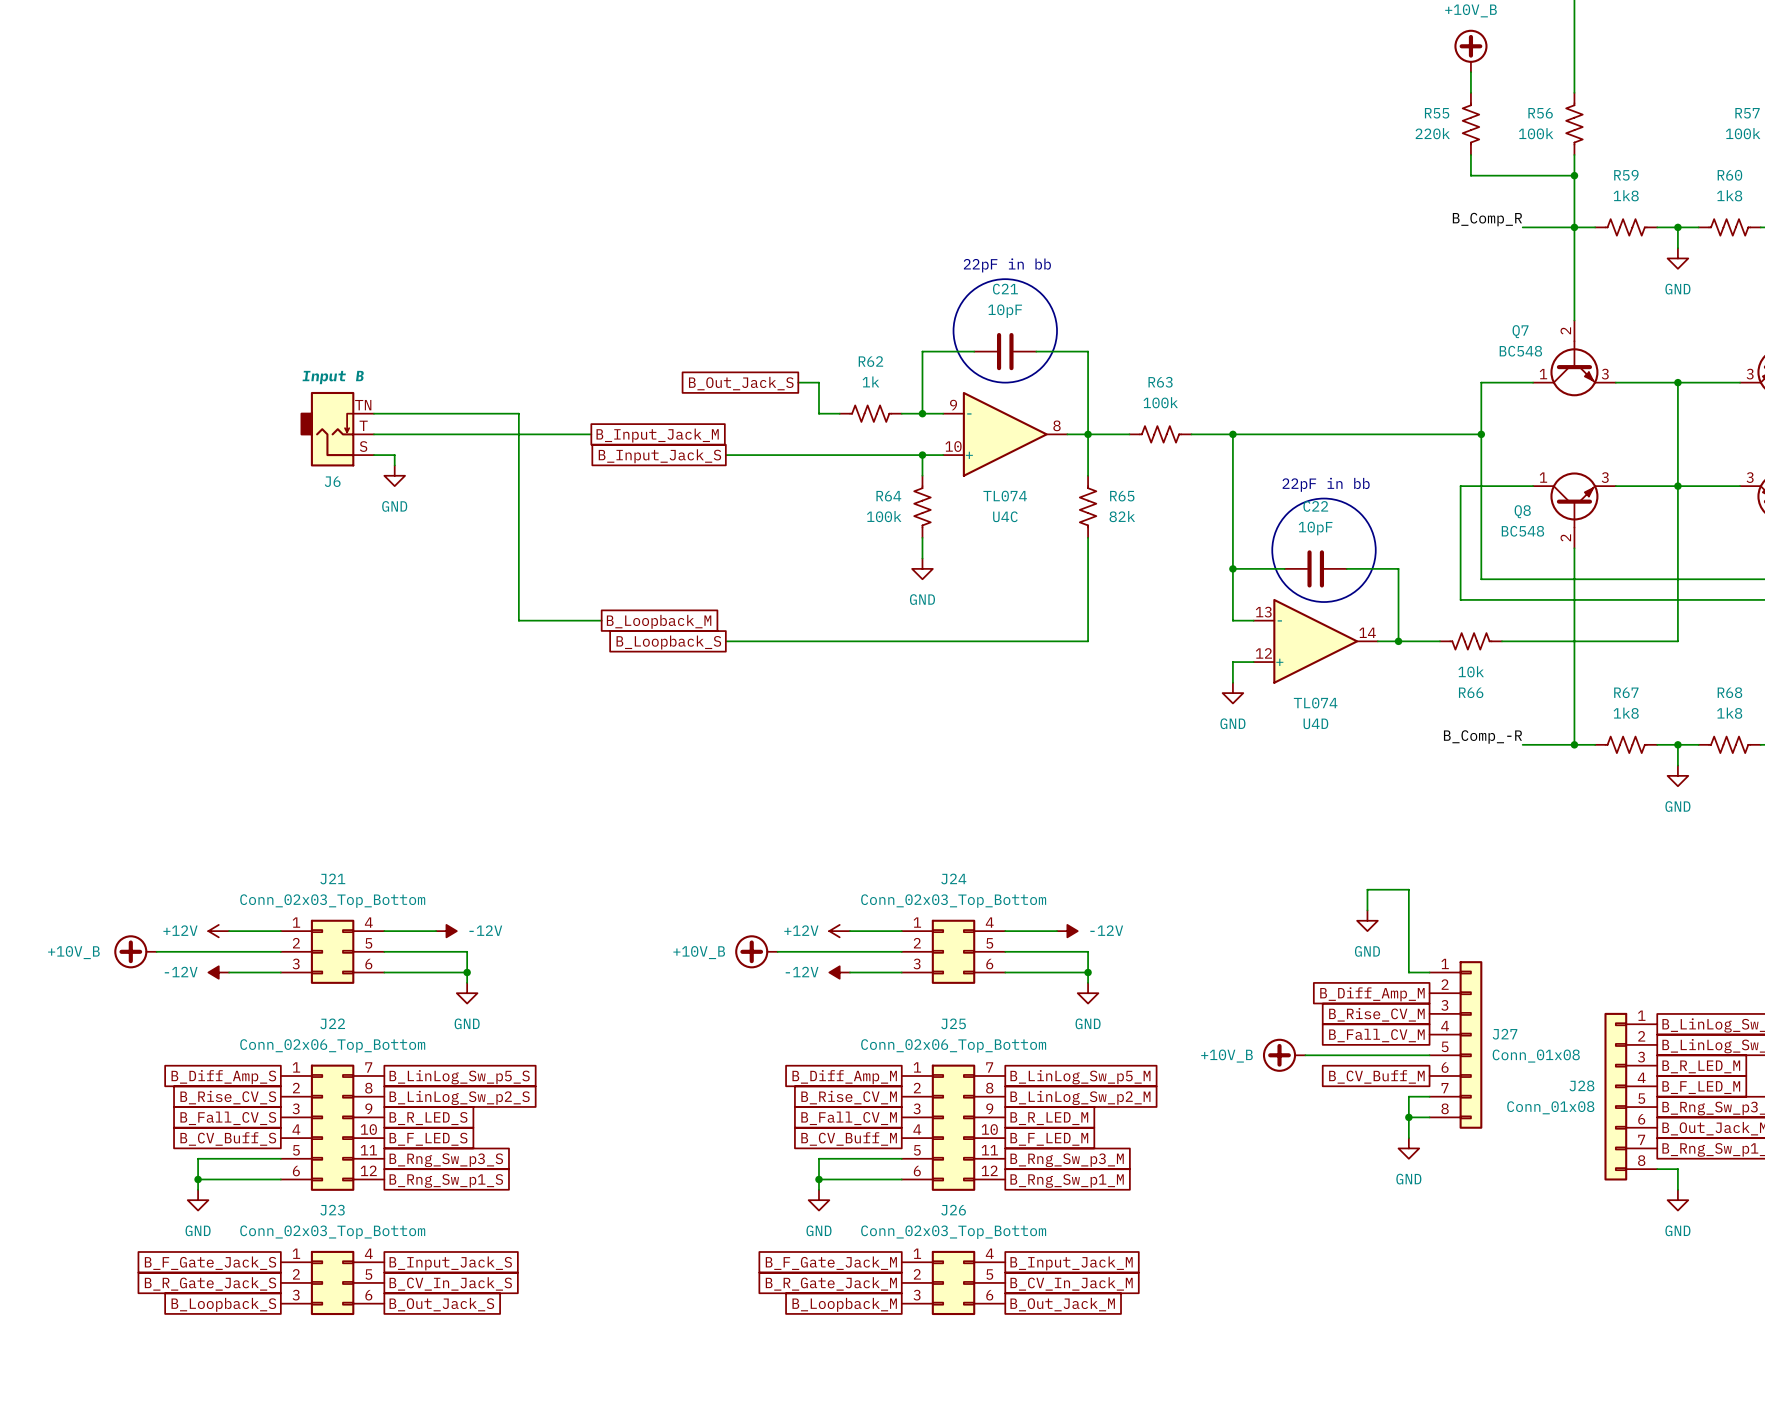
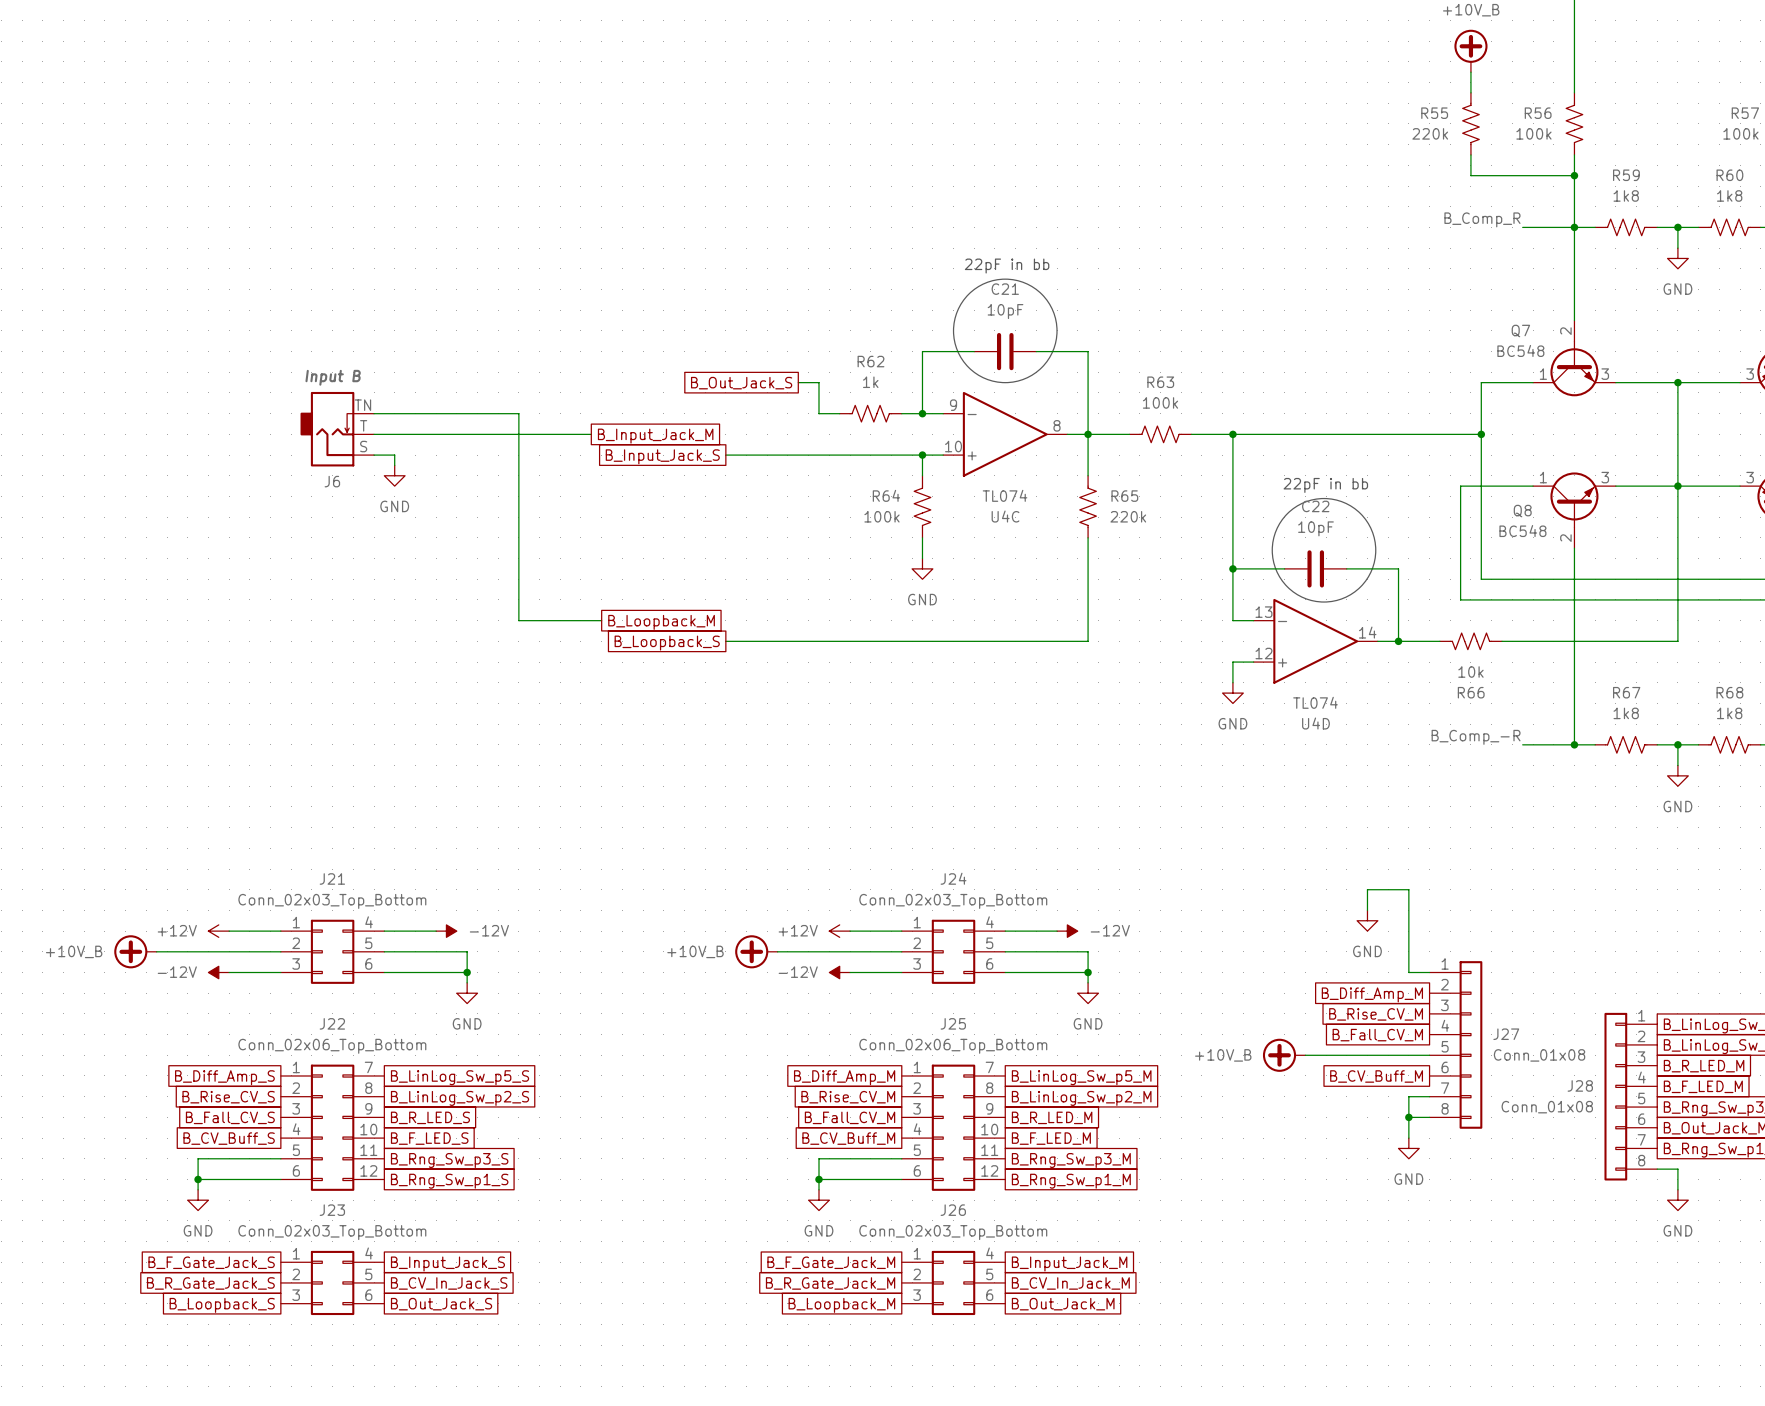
R65 value: 82k (1122, 516) -> 220k (1128, 516)

